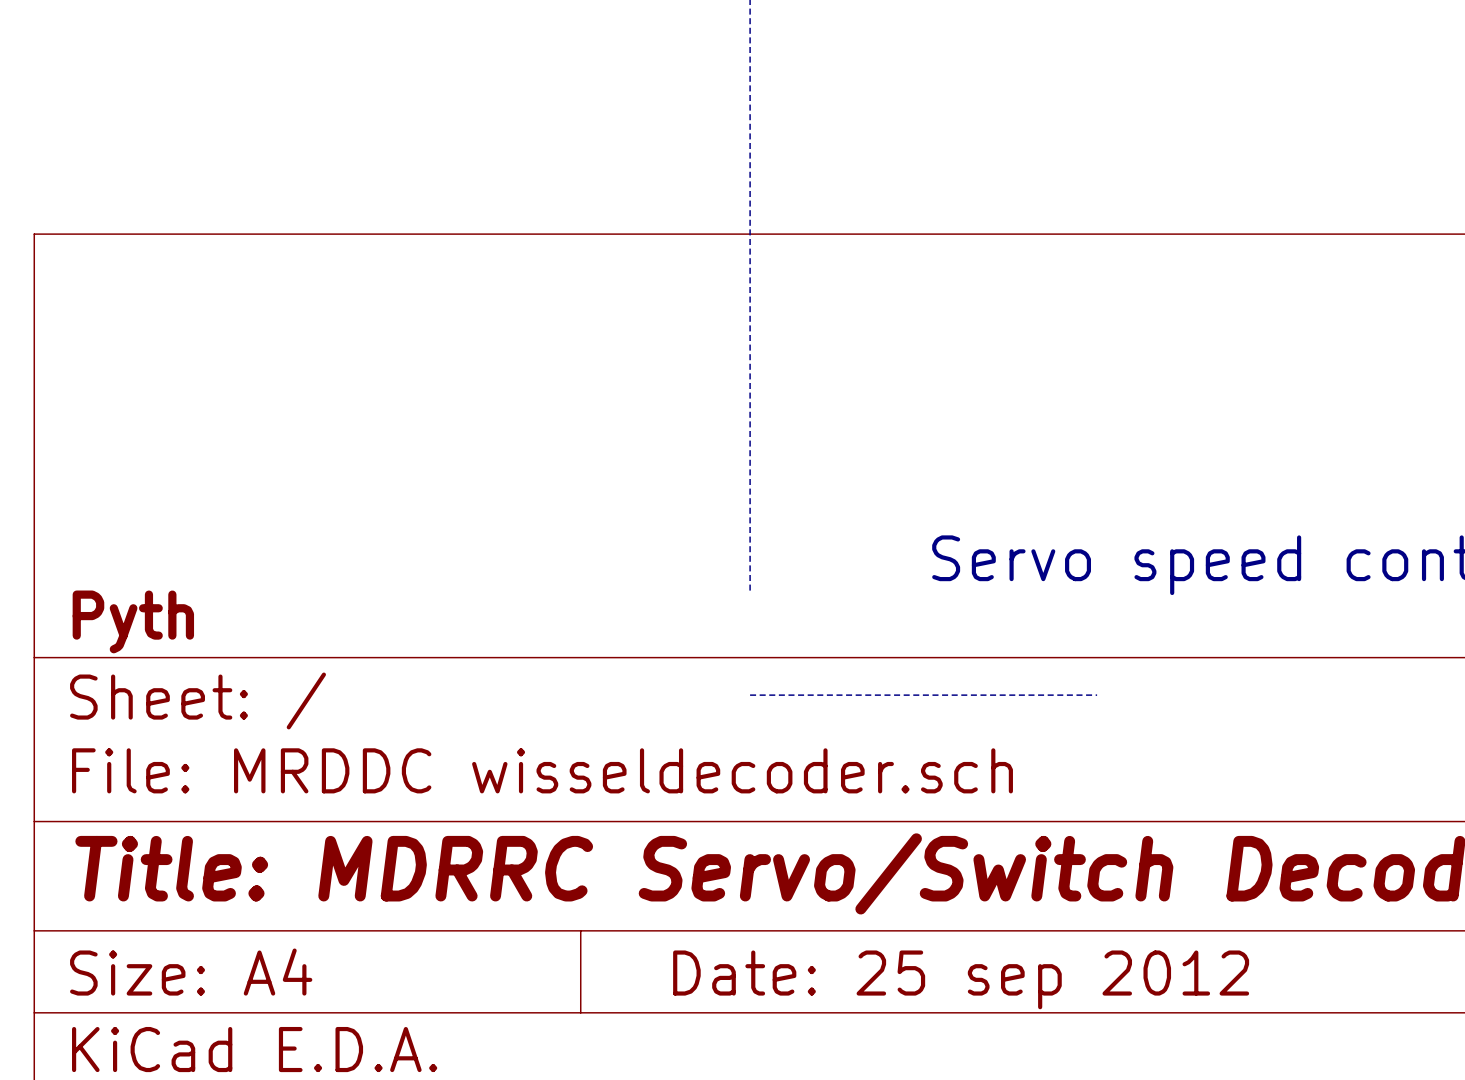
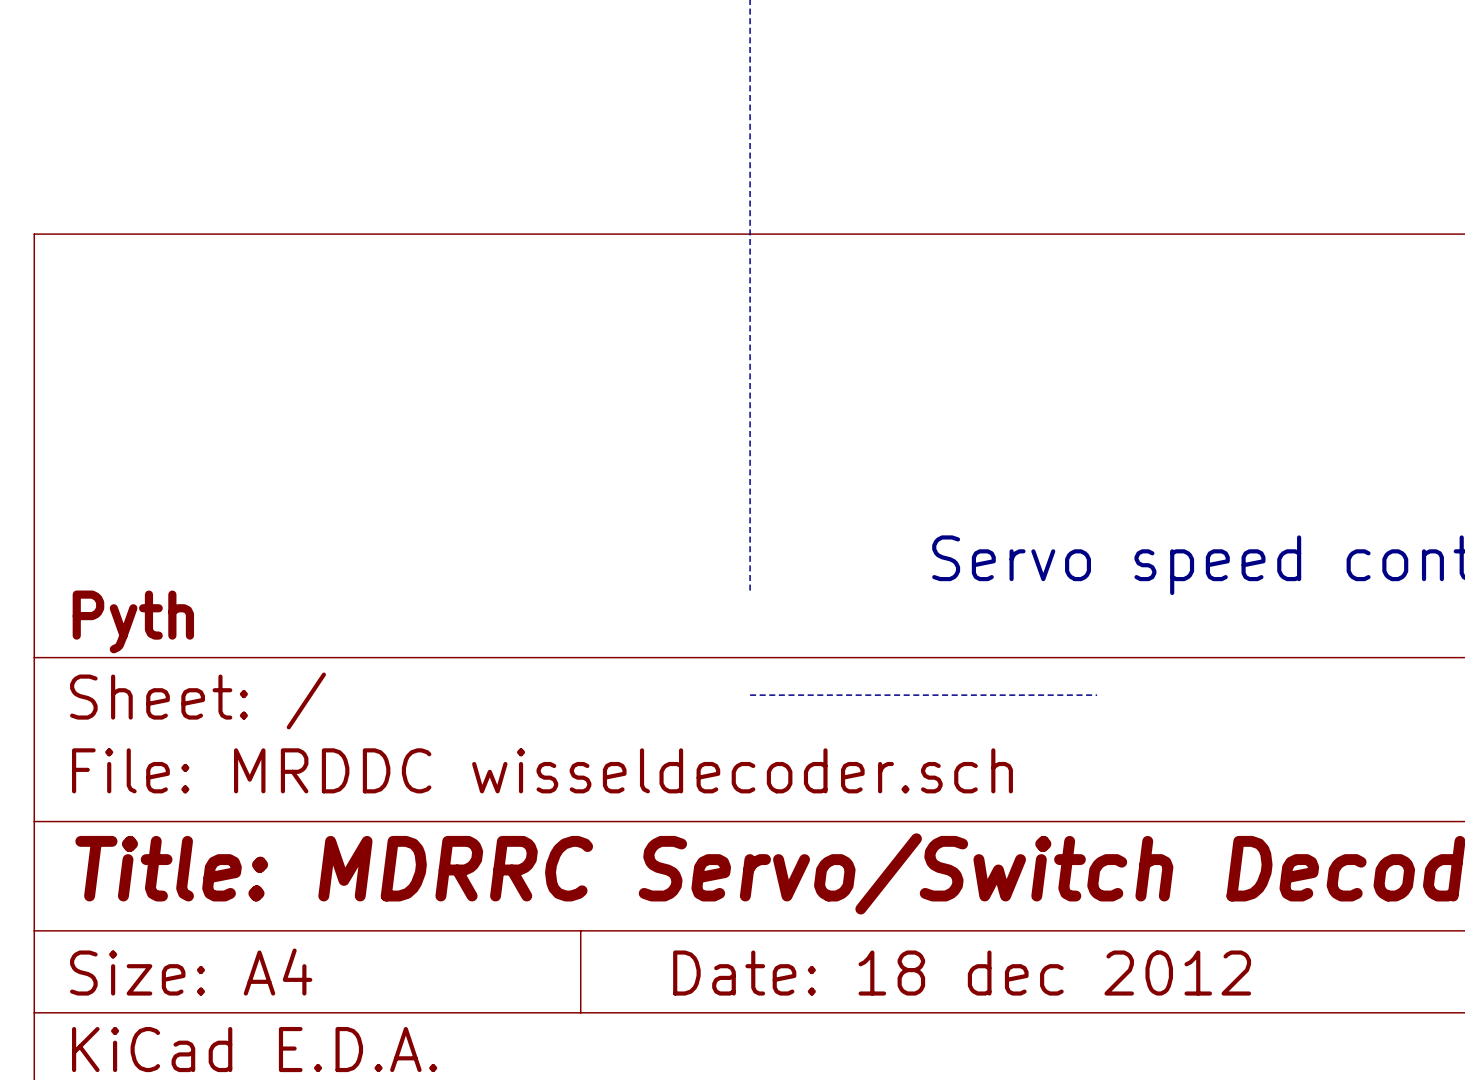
title block: Date: 25 sep 2012 (961, 979) -> Date: 18 dec 2012 (962, 973)

